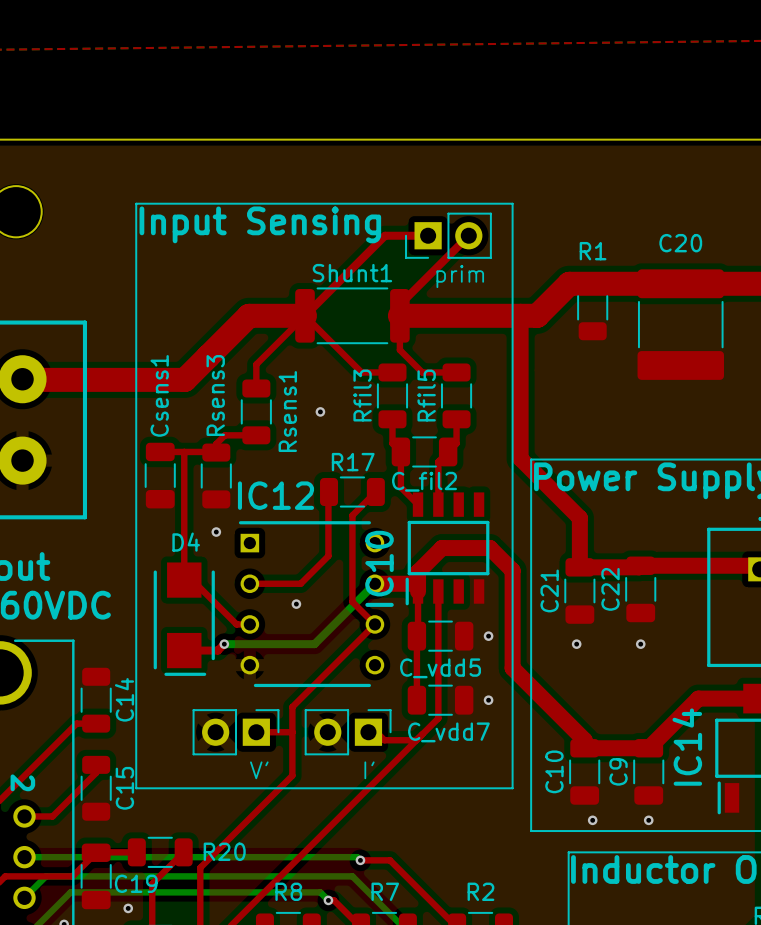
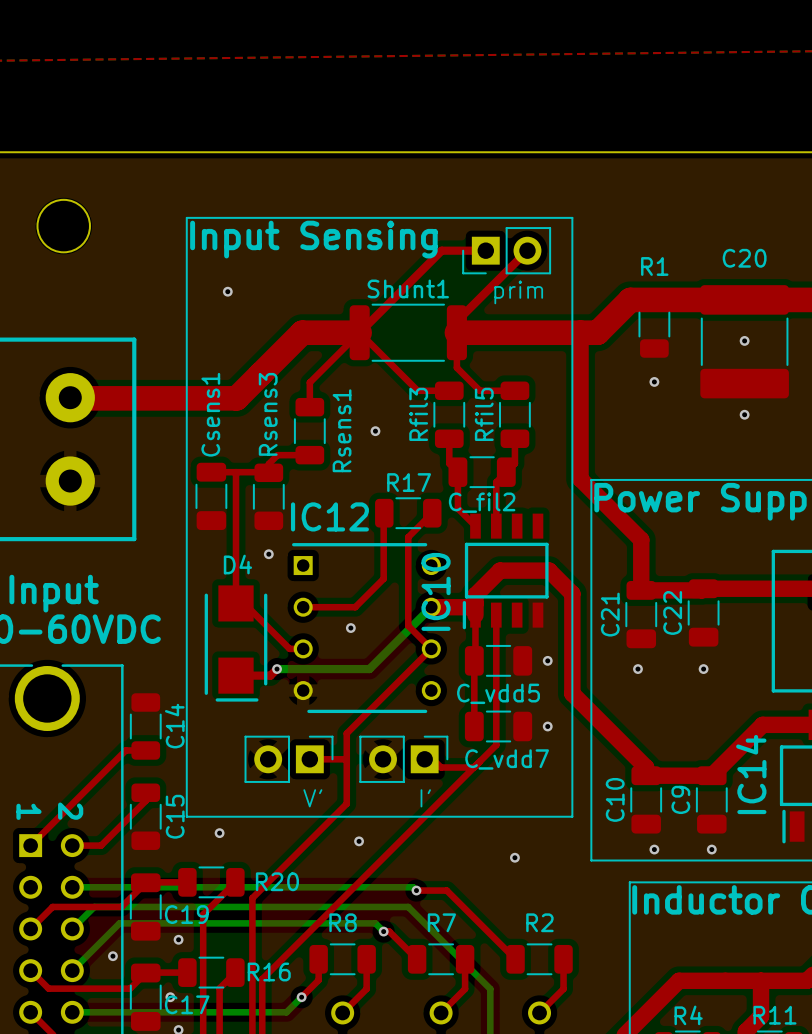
via: none -> (227, 291)
via: none -> (744, 340)
via: none -> (654, 381)
via: none -> (744, 414)
via: none -> (219, 833)
via: none -> (359, 841)
via: none -> (514, 857)

